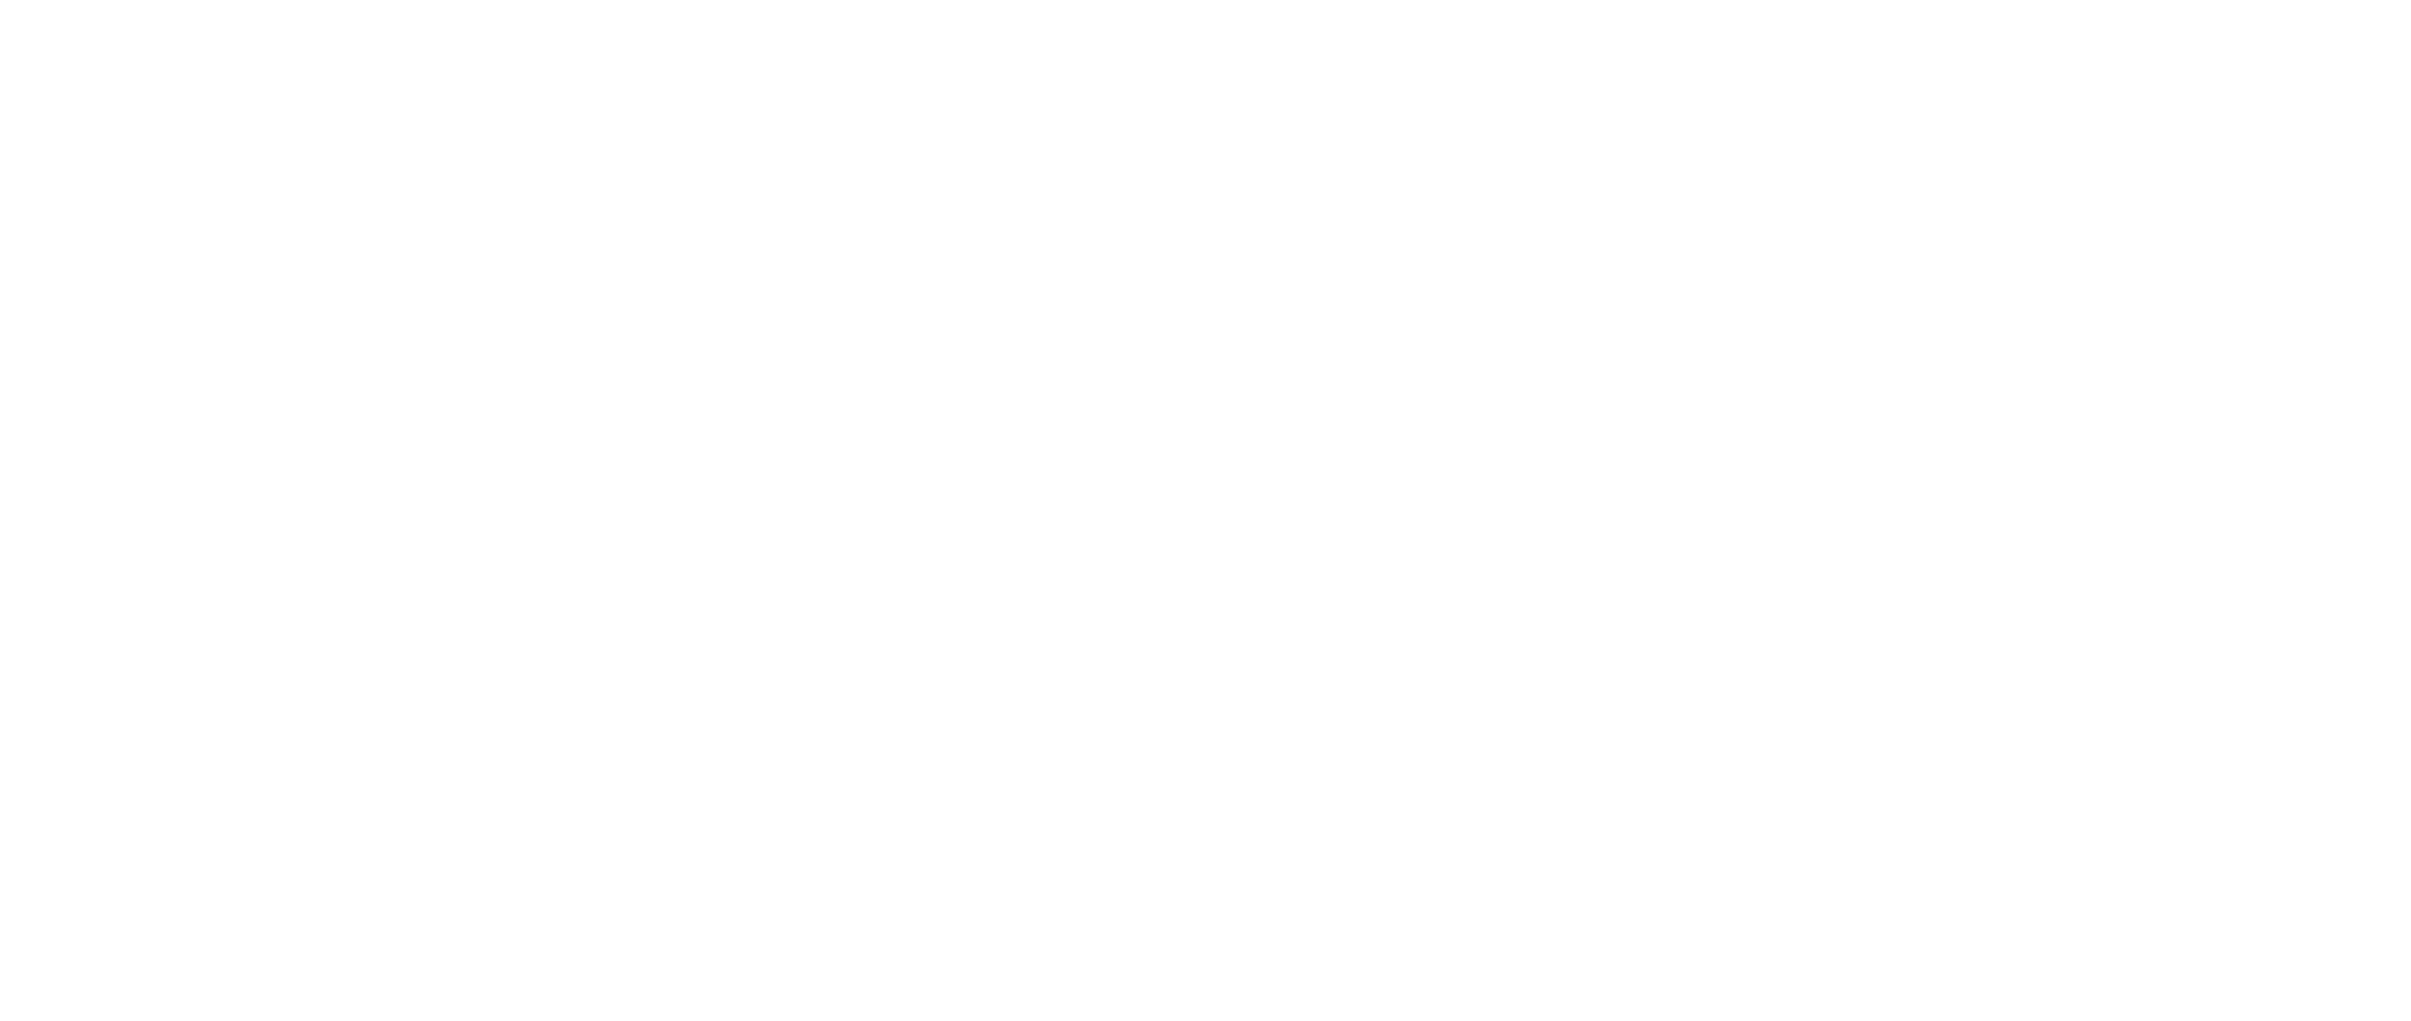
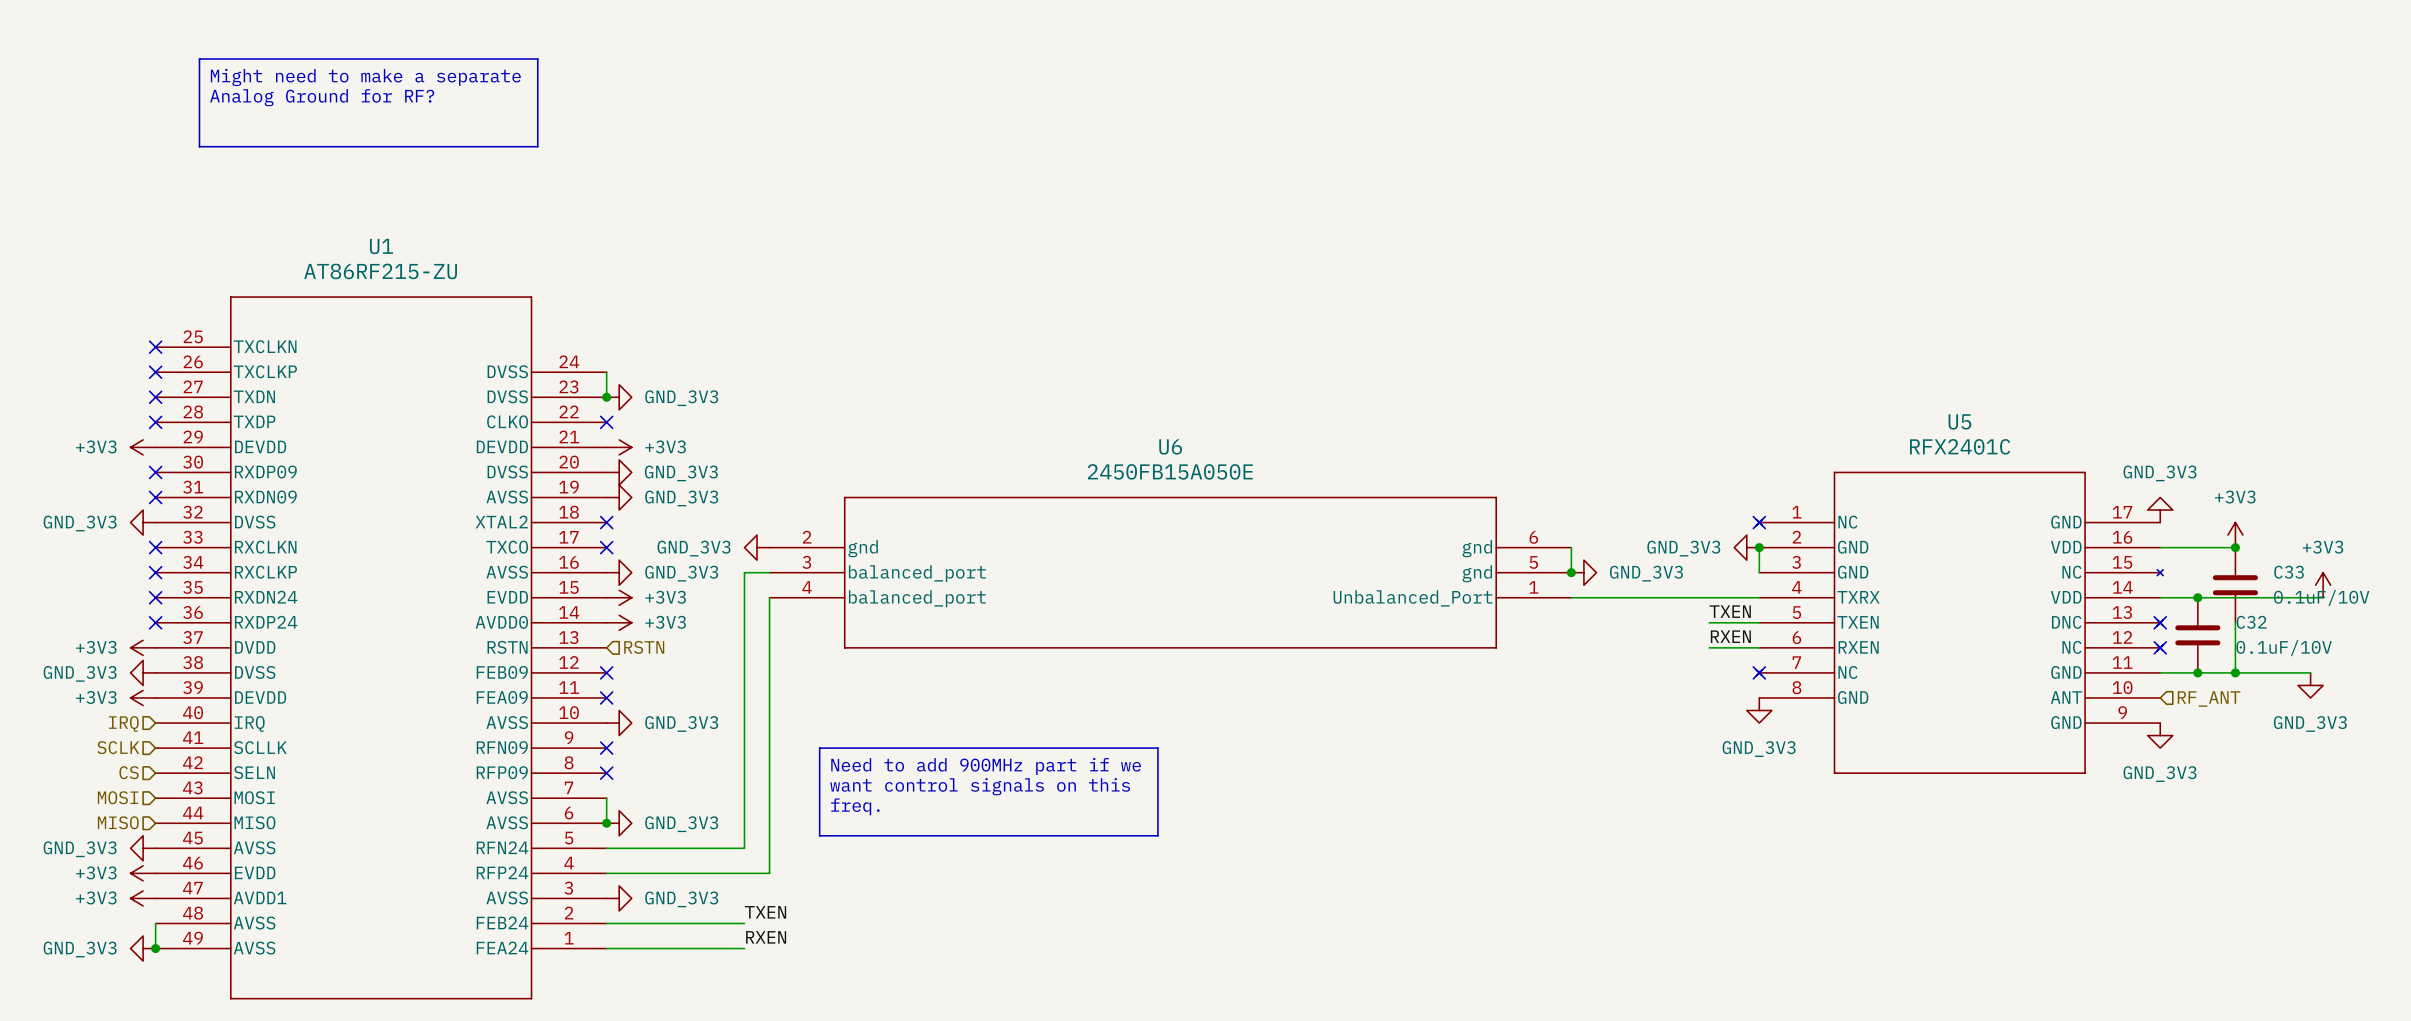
line: none -> (199, 59) (537, 59) (537, 146) (199, 146) (199, 59)
text: none -> Might need to make a separate (365, 77)
text: none -> Analog Ground for RF? (322, 97)
no-connect mark: none -> (155, 347)
no-connect mark: none -> (155, 372)
wire: none -> (606, 372) (606, 397)
no-connect mark: none -> (155, 397)
junction: none -> (606, 397)
power symbol: none -> GND_3V3 (619, 397)
no-connect mark: none -> (155, 422)
no-connect mark: none -> (606, 422)
power symbol: none -> +3V3 (143, 447)
power symbol: none -> +3V3 (619, 447)
no-connect mark: none -> (155, 472)
power symbol: none -> GND_3V3 (619, 472)
no-connect mark: none -> (155, 497)
power symbol: none -> GND_3V3 (619, 497)
power symbol: none -> GND_3V3 (2160, 510)
power symbol: none -> GND_3V3 (143, 522)
no-connect mark: none -> (606, 522)
no-connect mark: none -> (1759, 522)
power symbol: none -> +3V3 (2235, 535)
no-connect mark: none -> (155, 547)
no-connect mark: none -> (606, 547)
power symbol: none -> GND_3V3 (757, 547)
wire: none -> (1571, 547) (1571, 572)
power symbol: none -> GND_3V3 (1746, 547)
wire: none -> (1759, 547) (1759, 572)
junction: none -> (1759, 547)
wire: none -> (2160, 547) (2235, 547)
junction: none -> (2235, 547)
no-connect mark: none -> (155, 572)
power symbol: none -> GND_3V3 (619, 572)
wire: none -> (769, 572) (744, 572) (744, 848) (606, 848)
U6: none -> 2450FB15A050E (1170, 572)
junction: none -> (1571, 572)
power symbol: none -> GND_3V3 (1583, 572)
C33: none -> 0.1uF/10V (2235, 585)
power symbol: none -> +3V3 (2323, 585)
no-connect mark: none -> (155, 597)
power symbol: none -> +3V3 (619, 597)
wire: none -> (769, 597) (769, 873) (606, 873)
wire: none -> (1571, 597) (1759, 597)
wire: none -> (2160, 597) (2323, 597)
junction: none -> (2197, 597)
label: none -> TXEN (1730, 611)
no-connect mark: none -> (155, 622)
power symbol: none -> +3V3 (619, 622)
wire: none -> (1709, 622) (1759, 622)
U5: none -> RFX2401C (1959, 622)
no-connect mark: none -> (2160, 622)
wire: none -> (2235, 622) (2235, 672)
C32: none -> 0.1uF/10V (2197, 635)
label: none -> RXEN (1730, 636)
power symbol: none -> +3V3 (143, 647)
U1: none -> AT86RF215-ZU (381, 647)
hierarchical label: none -> RSTN (644, 647)
wire: none -> (1709, 647) (1759, 647)
no-connect mark: none -> (2160, 647)
power symbol: none -> GND_3V3 (143, 672)
no-connect mark: none -> (606, 672)
no-connect mark: none -> (1759, 672)
wire: none -> (2160, 672) (2310, 672)
junction: none -> (2197, 672)
junction: none -> (2235, 672)
power symbol: none -> GND_3V3 (2310, 685)
power symbol: none -> +3V3 (143, 697)
no-connect mark: none -> (606, 697)
hierarchical label: none -> RF_ANT (2209, 699)
power symbol: none -> GND_3V3 (1759, 710)
power symbol: none -> GND_3V3 (619, 723)
hierarchical label: none -> IRQ (123, 723)
power symbol: none -> GND_3V3 (2160, 735)
hierarchical label: none -> SCLK (118, 747)
no-connect mark: none -> (606, 748)
line: none -> (819, 748) (1157, 748) (1157, 835) (819, 835) (819, 748)
text: none -> Need to add 900MHz part if we (986, 766)
hierarchical label: none -> CS (129, 772)
no-connect mark: none -> (606, 773)
text: none -> want control signals on this (980, 786)
hierarchical label: none -> MOSI (118, 797)
wire: none -> (606, 798) (606, 823)
text: none -> freq. (855, 806)
hierarchical label: none -> MISO (118, 822)
junction: none -> (606, 823)
power symbol: none -> GND_3V3 (619, 823)
power symbol: none -> GND_3V3 (143, 848)
power symbol: none -> +3V3 (143, 873)
power symbol: none -> +3V3 (143, 898)
power symbol: none -> GND_3V3 (619, 898)
label: none -> TXEN (765, 912)
wire: none -> (155, 923) (155, 948)
wire: none -> (606, 923) (744, 923)
label: none -> RXEN (766, 937)
power symbol: none -> GND_3V3 (143, 948)
junction: none -> (155, 948)
wire: none -> (606, 948) (744, 948)

